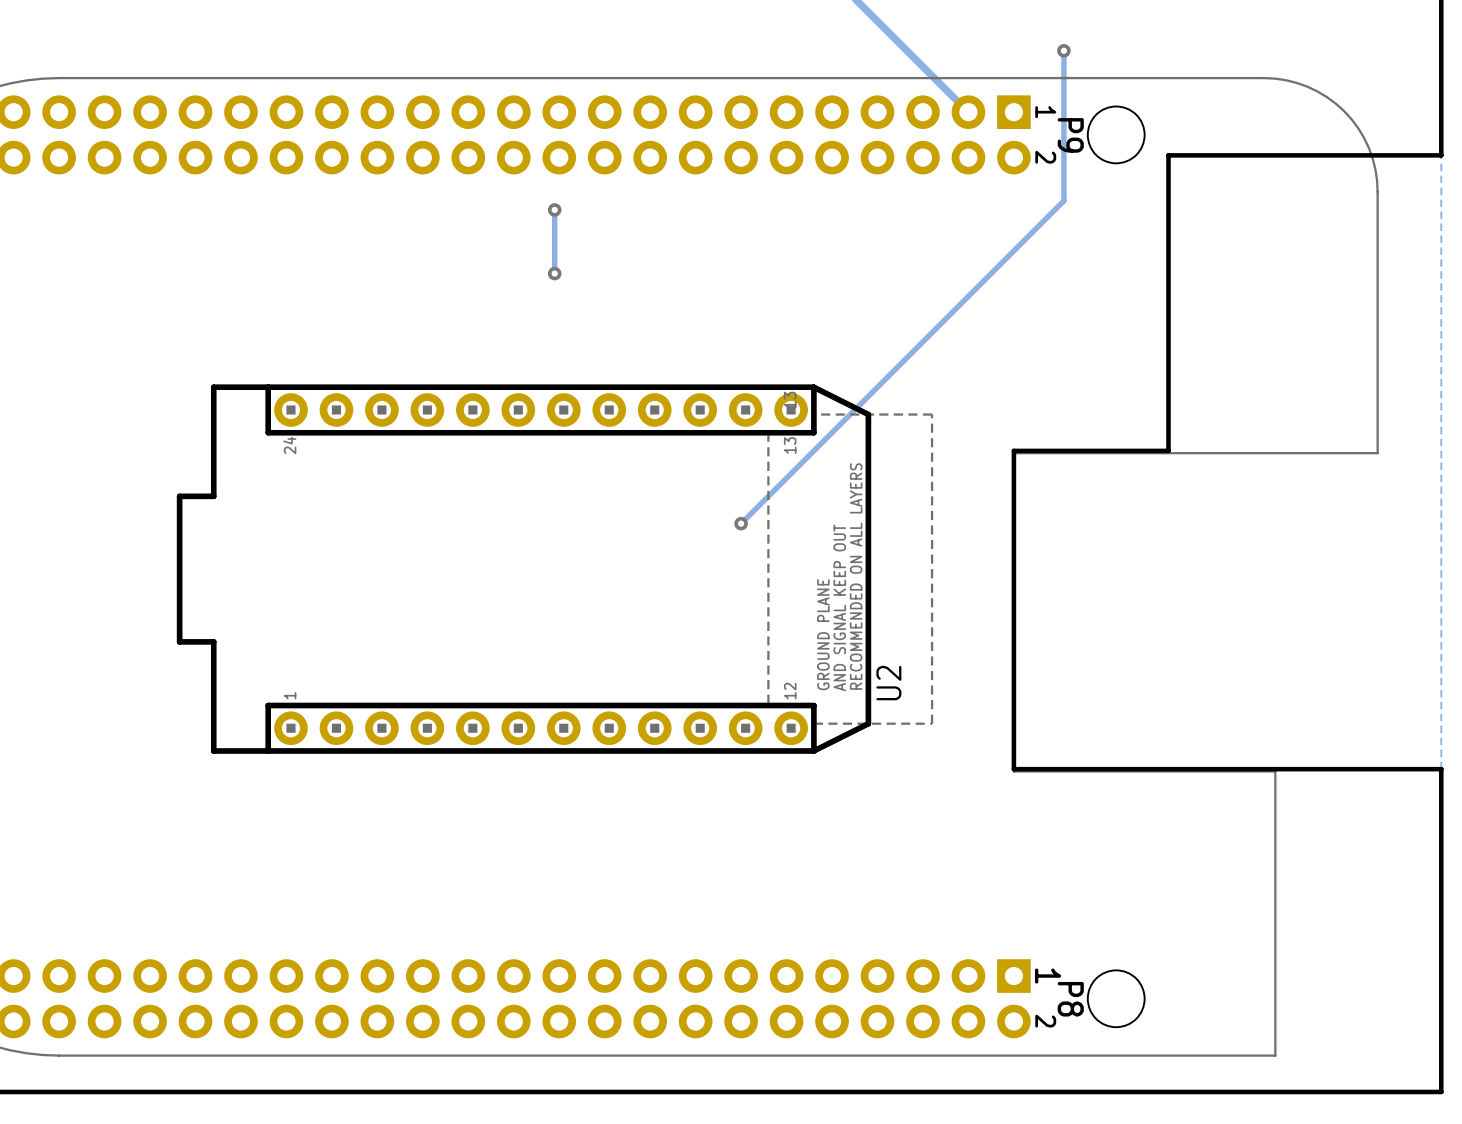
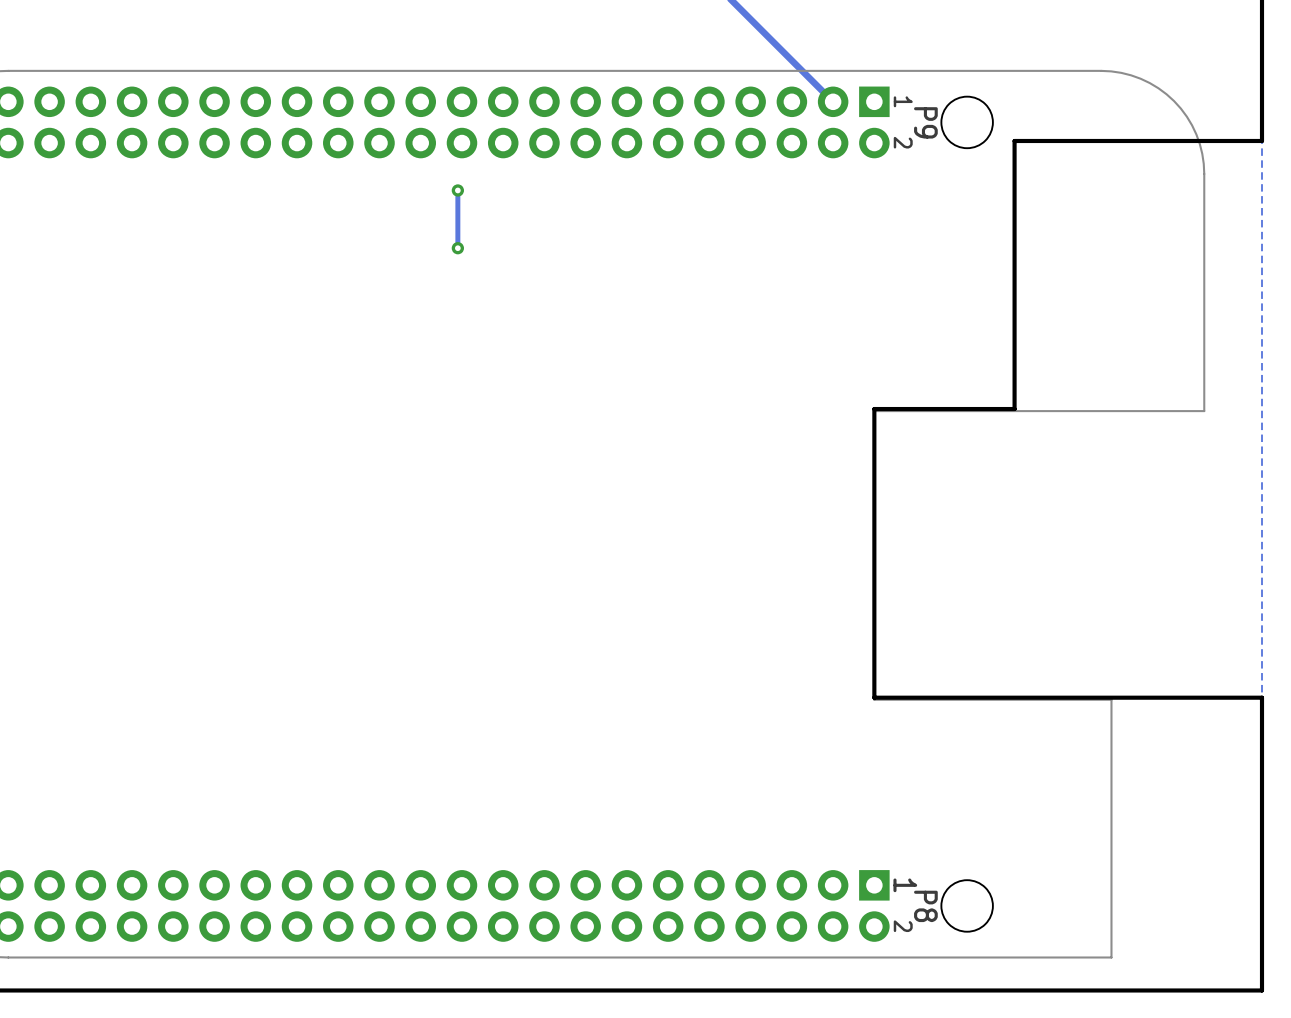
track: (1063, 50) (1063, 200) (741, 523) -> none
via: (1063, 50) -> none
via: (741, 523) -> none
U2: (555, 569) -> none

